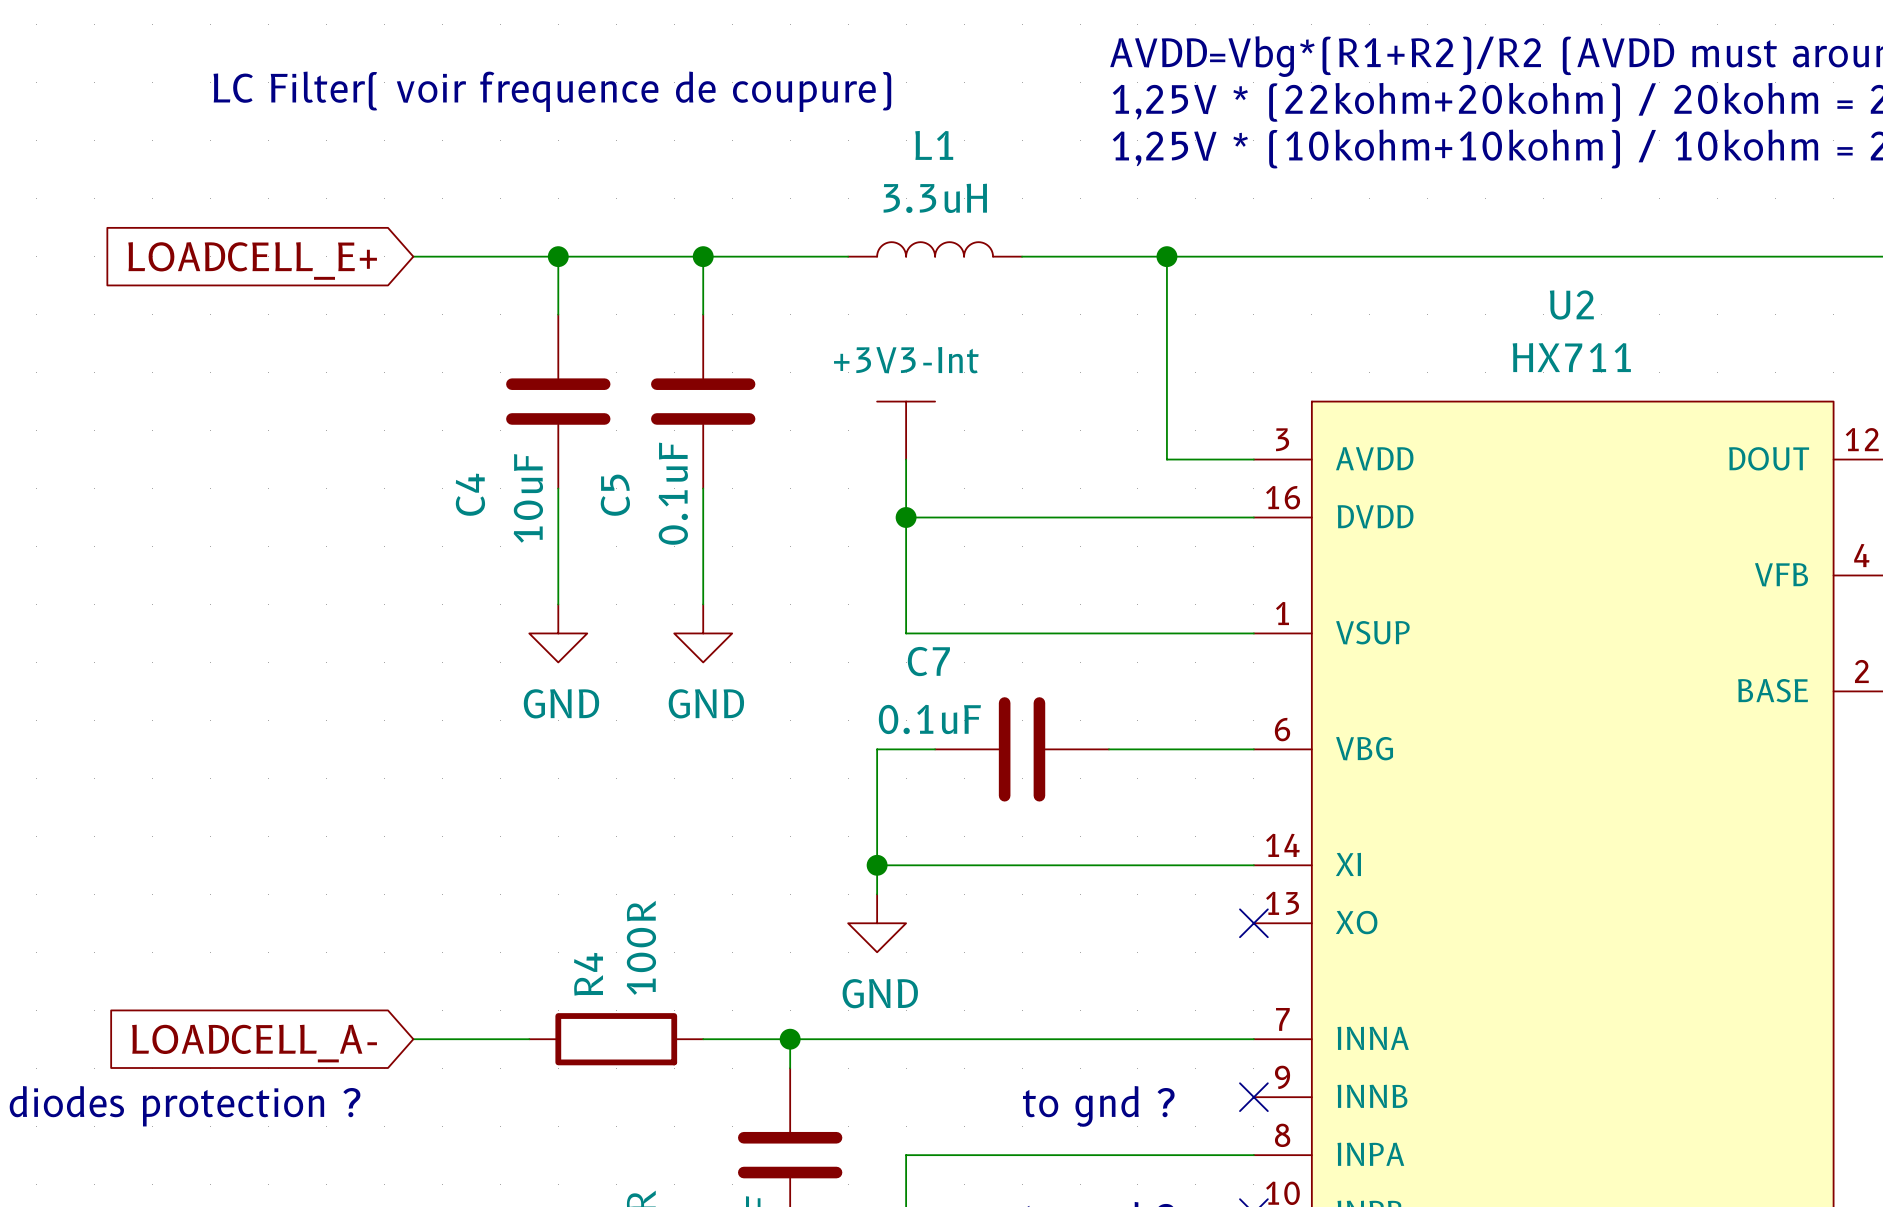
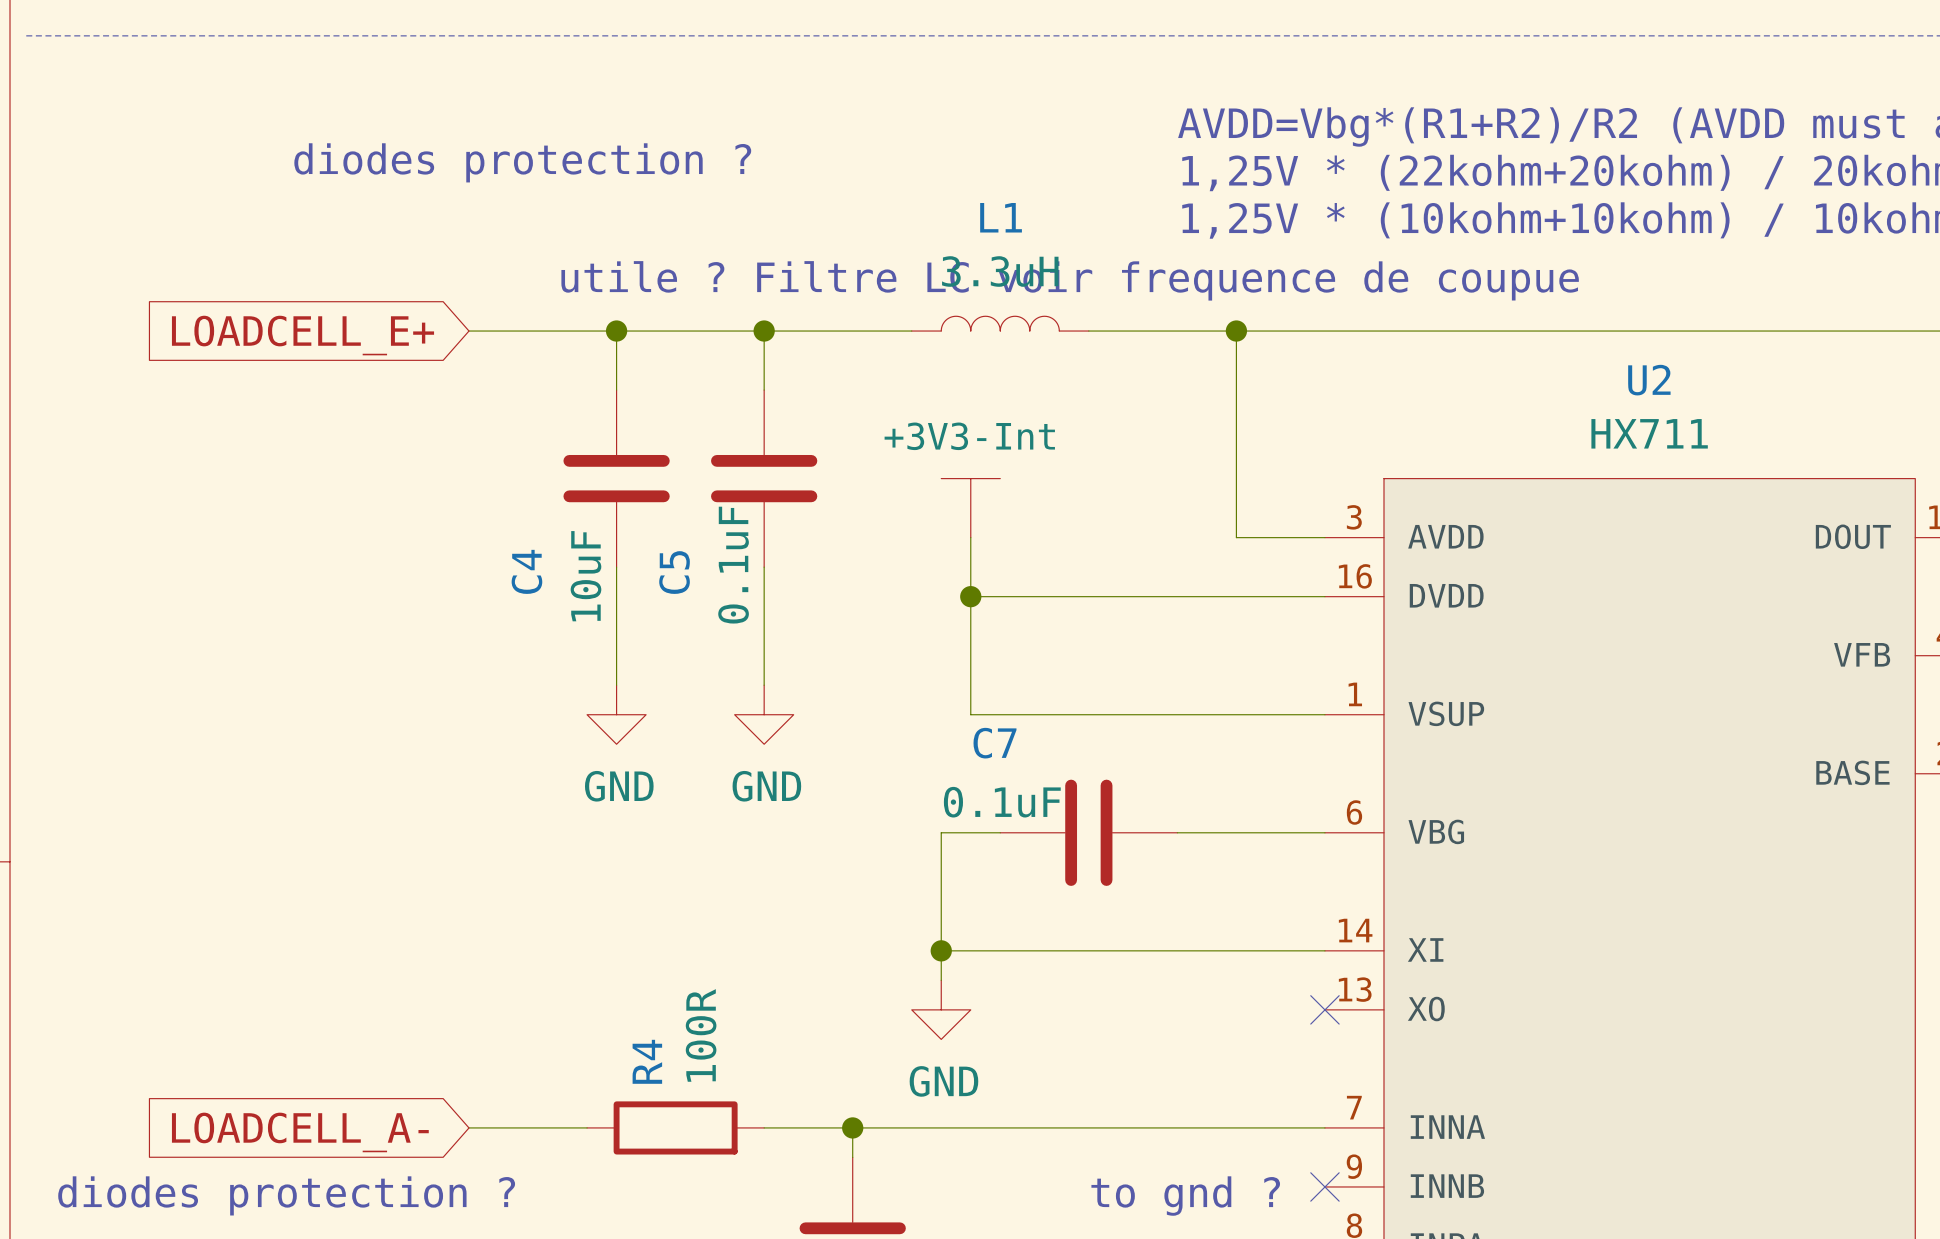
text: none -> diodes protection ? (522, 162)
text: LC Filter( voir frequence de coupure) (552, 91) -> none
text: none -> utile ? Filtre LC voir frequence de coupue (1070, 280)

